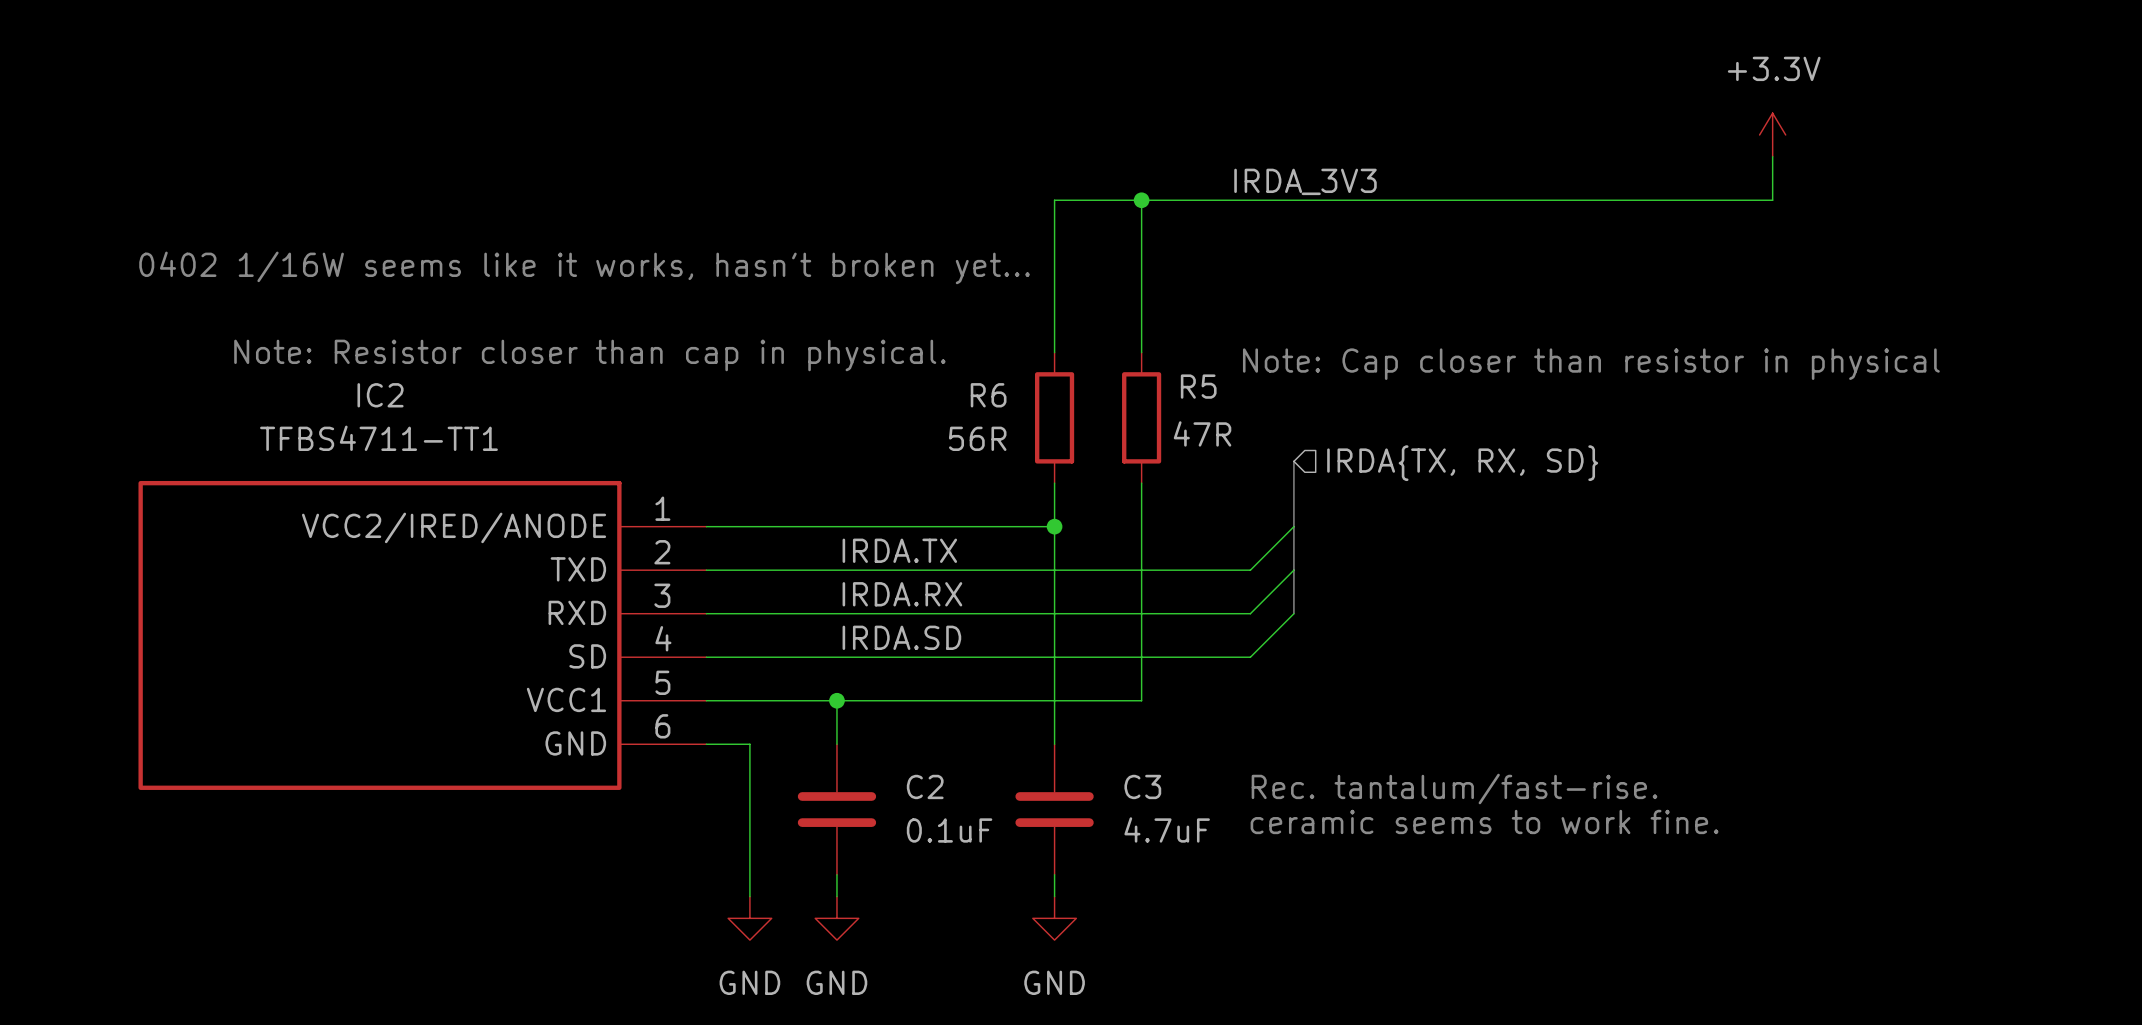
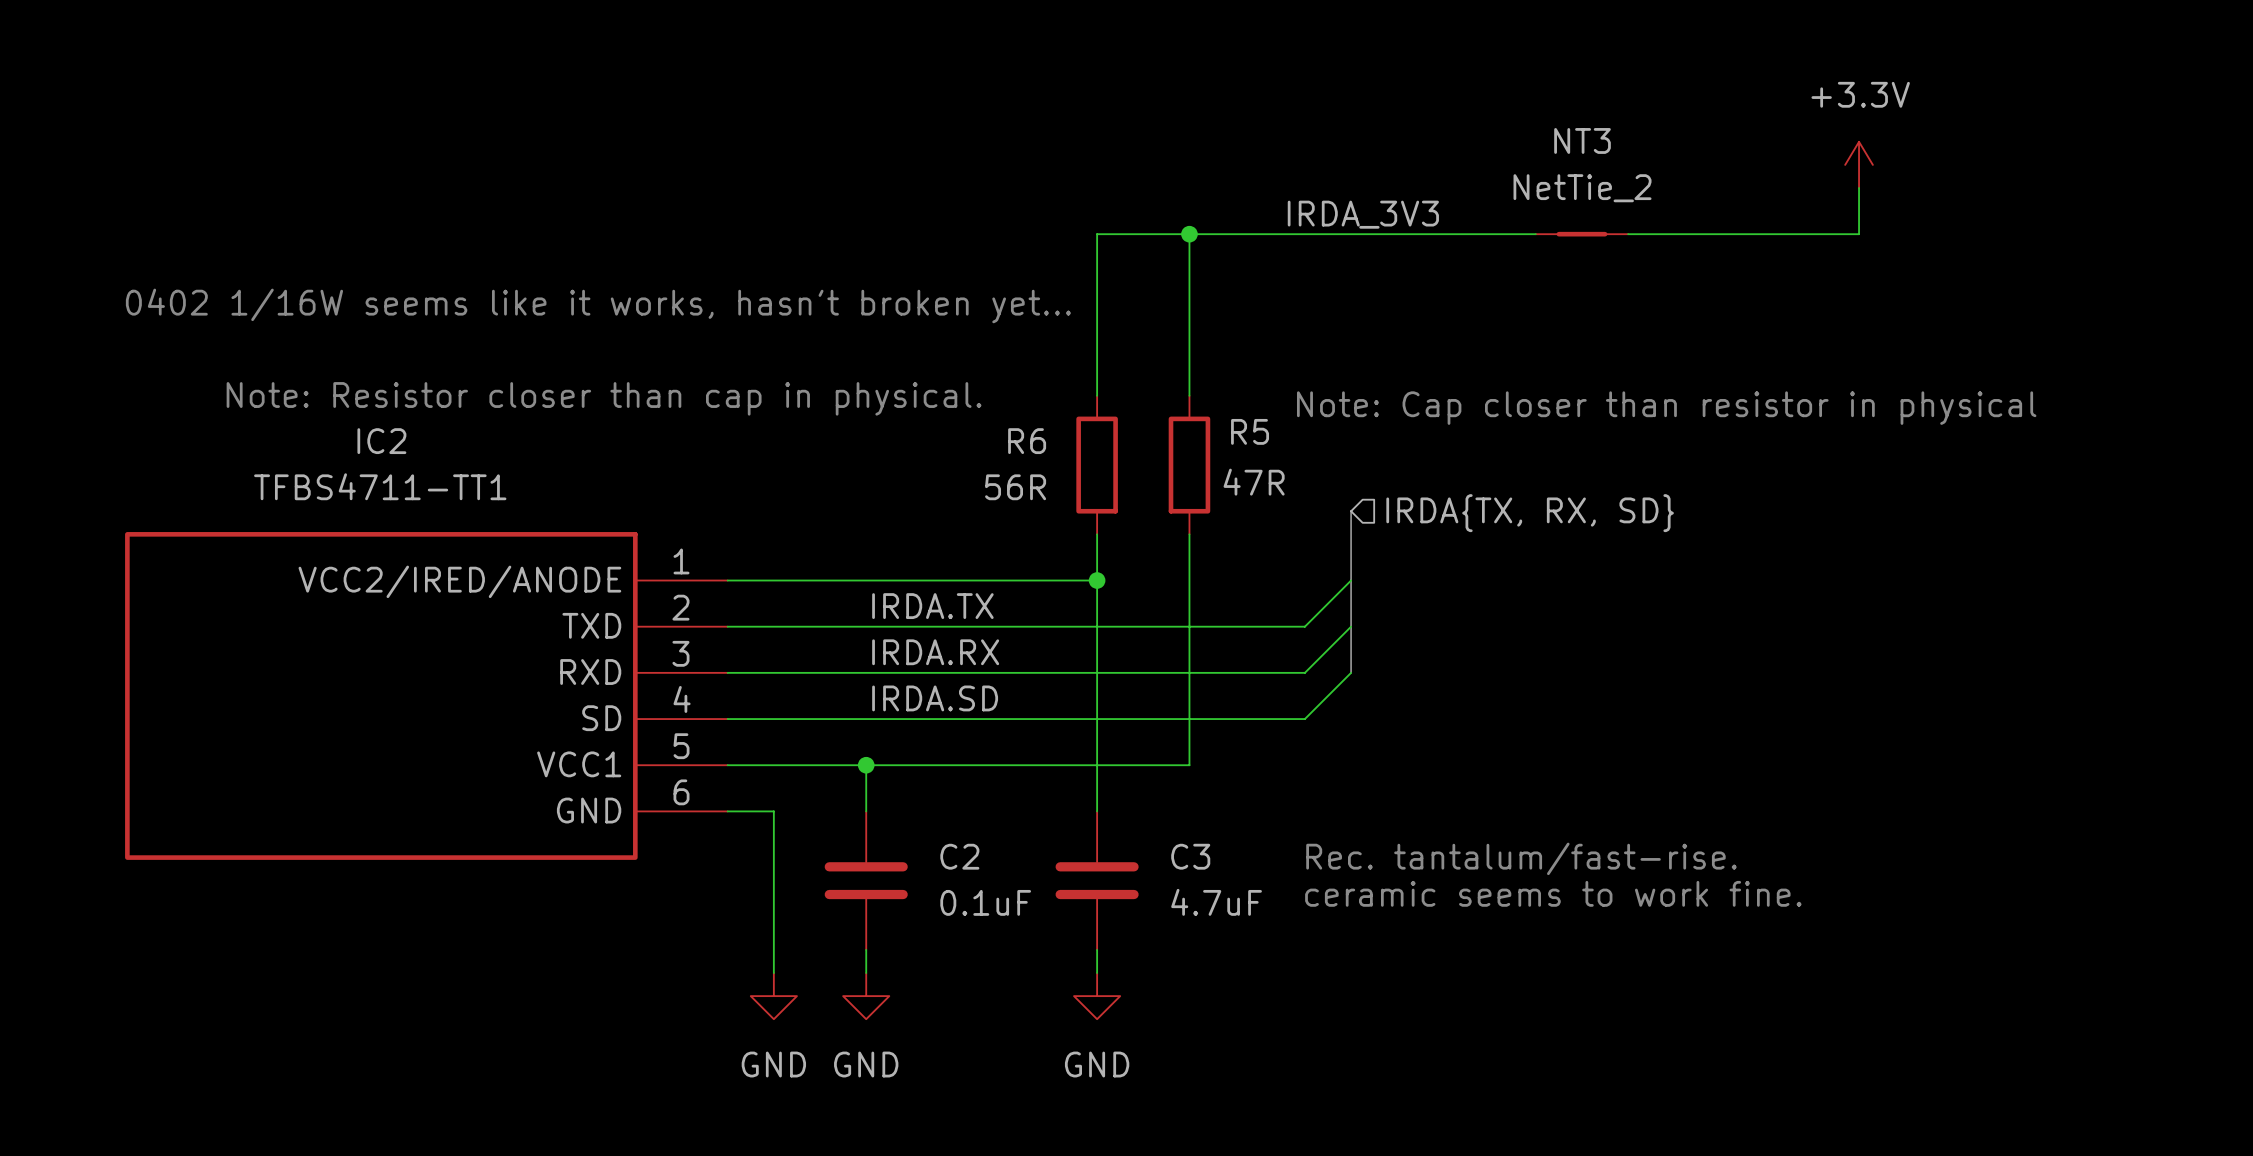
NT3: none -> NetTie_2 (1581, 234)

